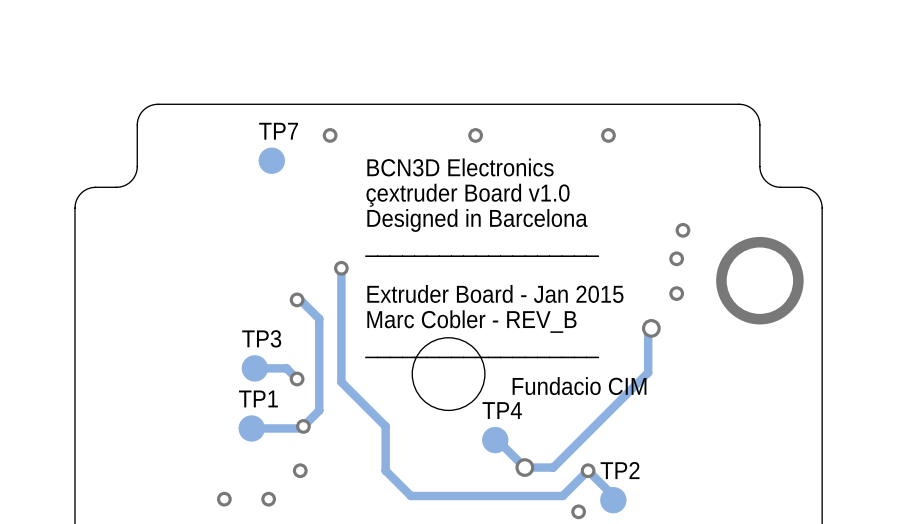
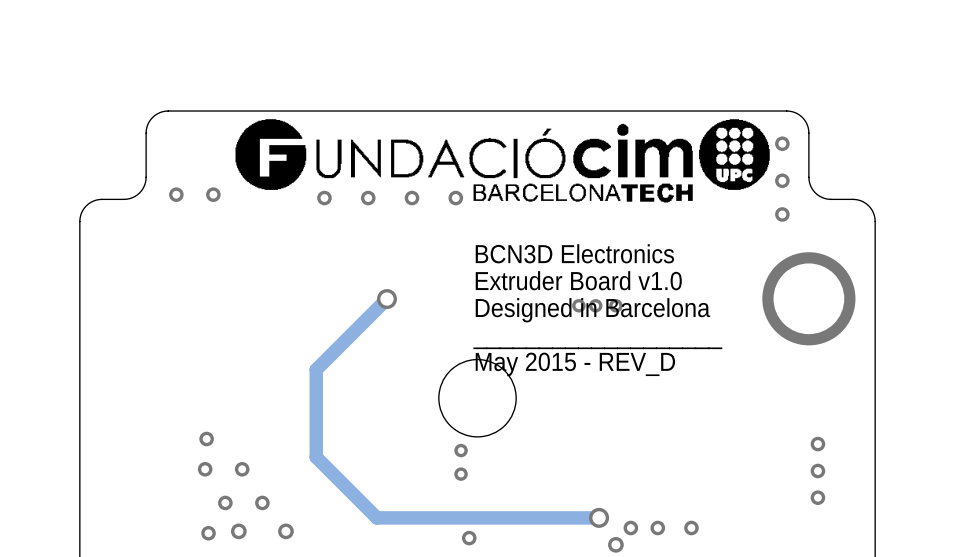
drawing: none -> [235, 119, 770, 203]
via: (330, 135) -> none
via: (475, 135) -> none
via: (608, 135) -> none
via: none -> (782, 143)
TP7: (271, 160) -> none
text position: BCN3D Electronics (460, 167) -> BCN3D Electronics (574, 253)
via: none -> (782, 180)
via: none -> (176, 194)
via: none -> (213, 194)
via: none -> (324, 198)
via: none -> (368, 198)
via: none -> (412, 198)
via: none -> (455, 198)
text: çextruder Board v1.0 (468, 195) -> none
via: none -> (782, 214)
text position: Designed in Barcelona (477, 220) -> Designed in Barcelona (592, 310)
via: (682, 230) -> none
text: ___________________ (482, 256) -> none
via: (676, 258) -> none
track: (341, 268) (341, 382) (385, 426) (385, 470) (410, 496) (562, 496) (588, 470) (613, 495) (613, 500) -> none
via: (341, 268) -> none
track: none -> (386, 299) (316, 369) (316, 457) (376, 517) (599, 517)
via: none -> (386, 299)
via: none -> (578, 305)
via: none -> (595, 305)
via: none -> (615, 305)
text: Extruder Board - Jan 2015 (495, 293) -> Extruder Board v1.0 (578, 280)
via: (676, 293) -> none
track: (297, 299) (300, 299) (319, 318) (319, 410) (303, 426) (305, 428) (251, 428) -> none
via: (297, 299) -> none
text: Marc Cobler - REV_B (471, 321) -> none
track: (651, 328) (648, 331) (648, 372) (553, 467) (524, 467) (495, 440) -> none
via: (651, 328) -> none
text: none -> May 2015 - REV_D (575, 364)
text position: ___________________ (482, 357) -> ___________________ (597, 348)
track: (254, 368) (286, 368) (297, 378) -> none
TP3: (254, 368) -> none
via: (297, 378) -> none
text: Fundacio CIM (579, 386) -> none
via: none -> (206, 438)
via: none -> (817, 444)
via: none -> (461, 450)
via: (303, 426) -> none
TP1: (251, 428) -> none
via: none -> (205, 469)
via: none -> (242, 469)
TP4: (495, 440) -> none
via: none -> (817, 470)
via: none -> (461, 474)
via position: (524, 467) -> (599, 517)
via: none -> (817, 497)
via: (300, 470) -> none
via: (588, 470) -> none
via: none -> (225, 502)
via: none -> (262, 502)
via: none -> (630, 528)
via: none -> (657, 528)
via: none -> (691, 528)
via: none -> (208, 533)
TP2: (613, 500) -> none
via: none -> (469, 538)

